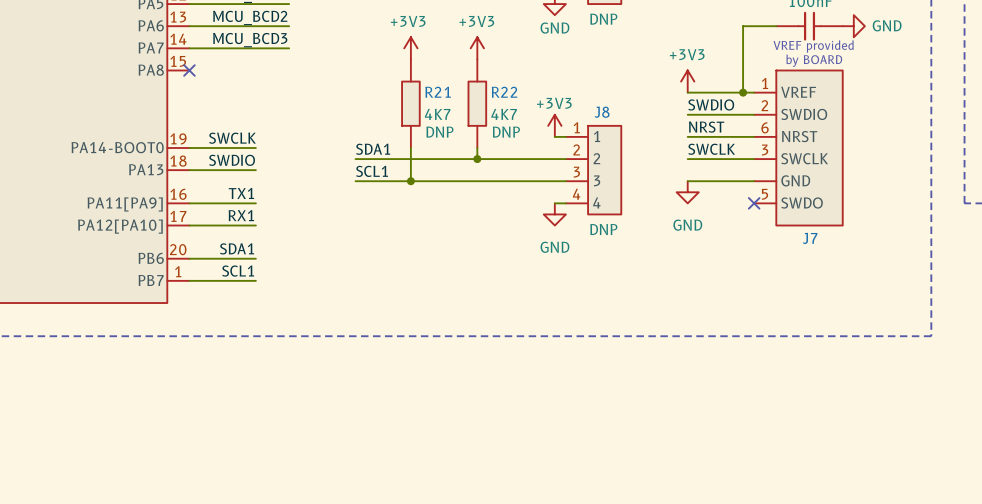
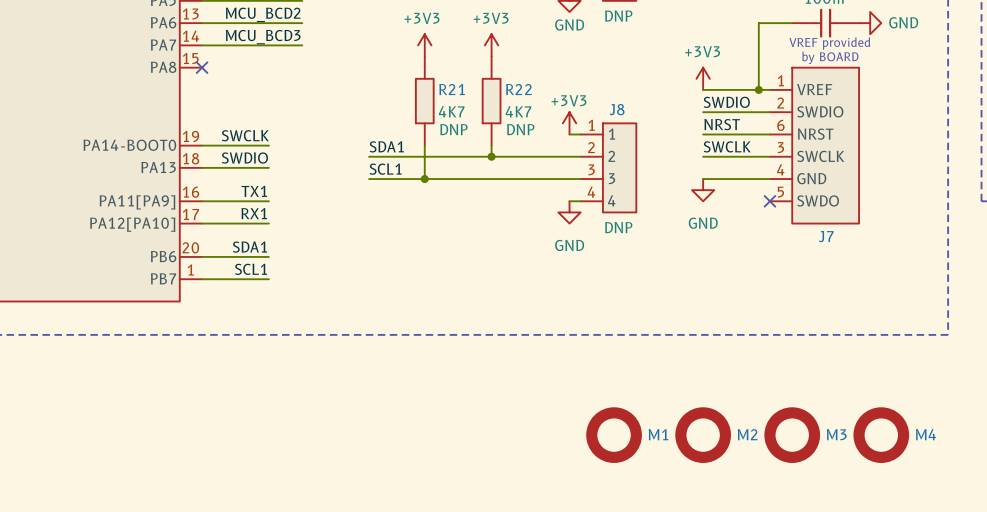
J7 pin number: none -> 4 (780, 169)
M1: none -> (614, 435)
M2: none -> (703, 435)
M3: none -> (792, 435)
M4: none -> (881, 435)

